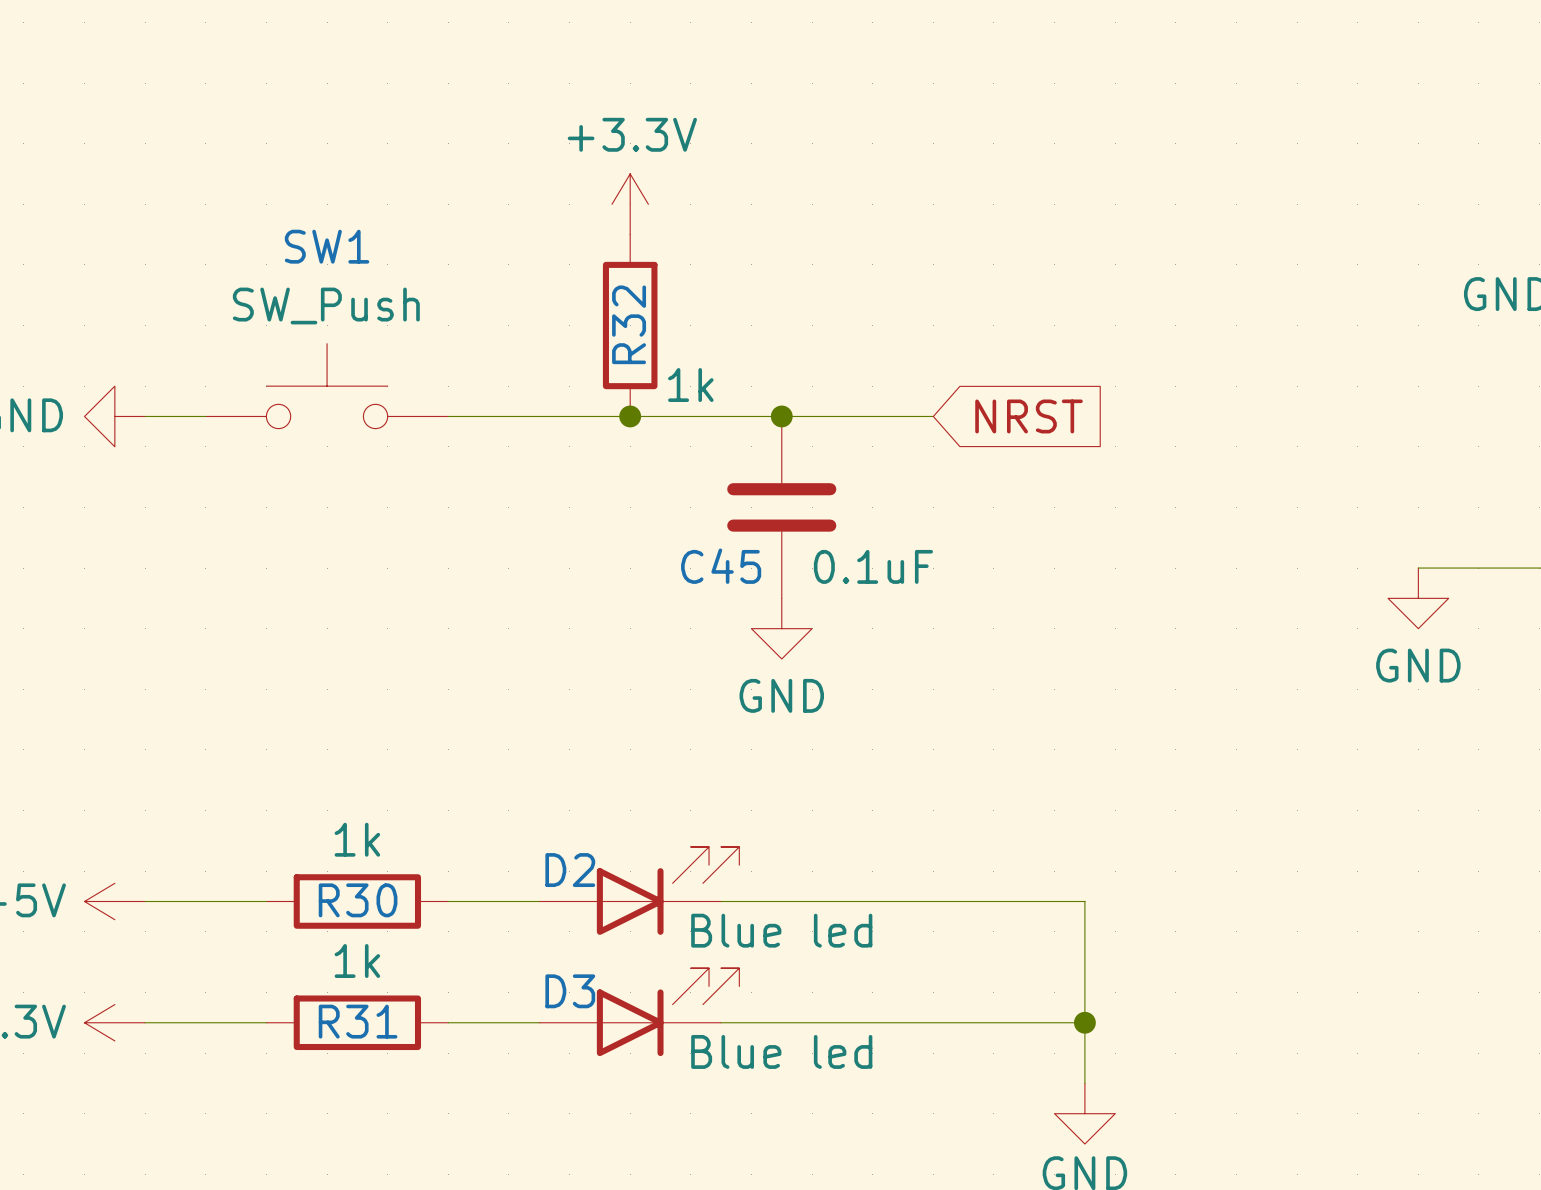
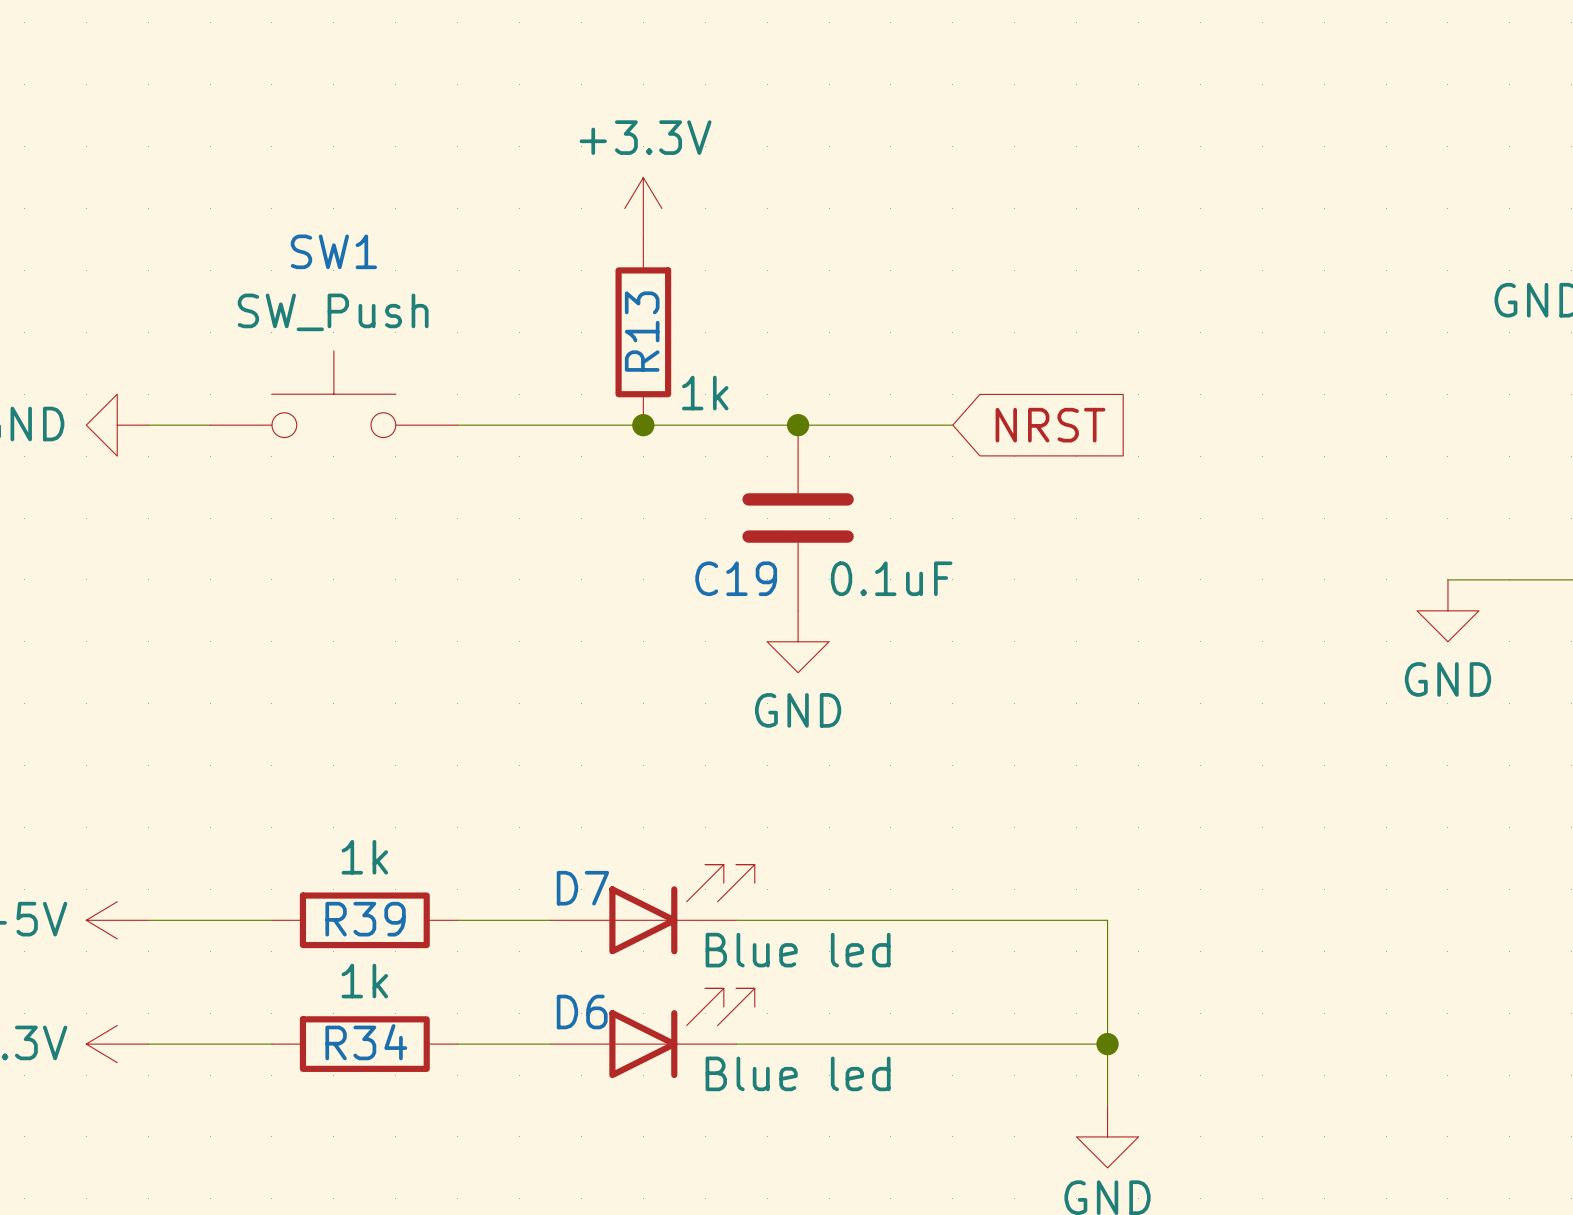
R32 name: R32 (629, 324) -> R13 (642, 331)
C45 name: C45 (721, 566) -> C19 (736, 578)
D2 name: D2 (570, 870) -> D7 (582, 888)
R30 name: R30 (358, 900) -> R39 (365, 919)
D3 name: D3 (570, 991) -> D6 (582, 1011)
R31 name: R31 (358, 1021) -> R34 (366, 1042)

